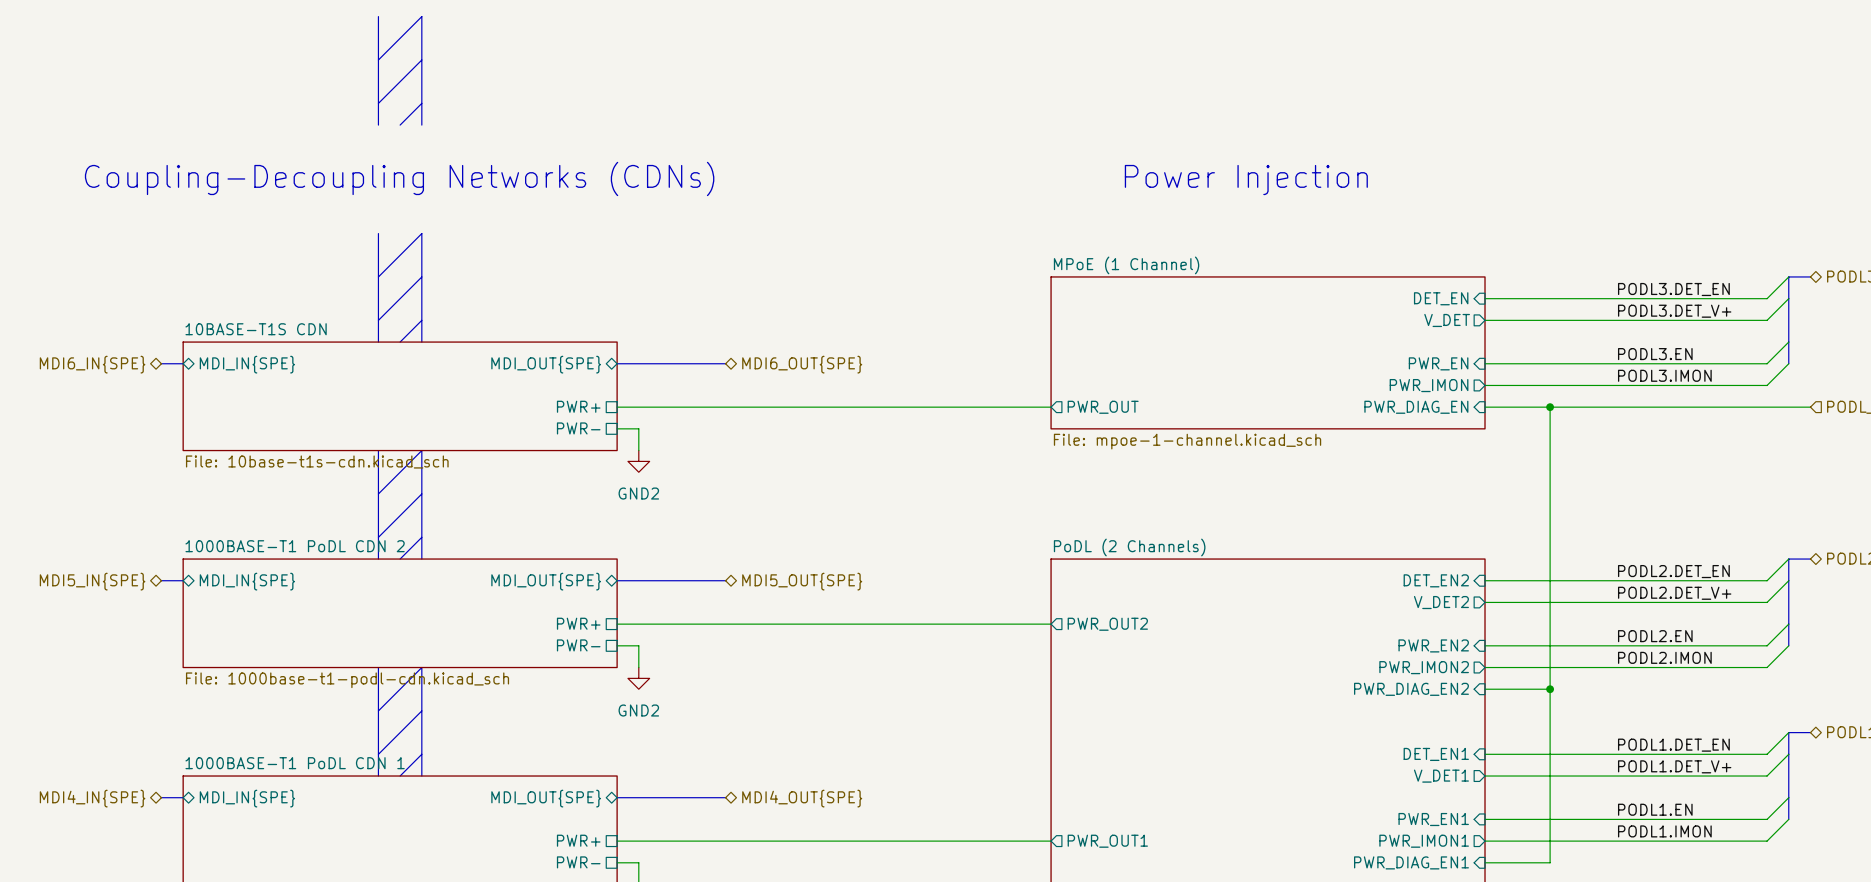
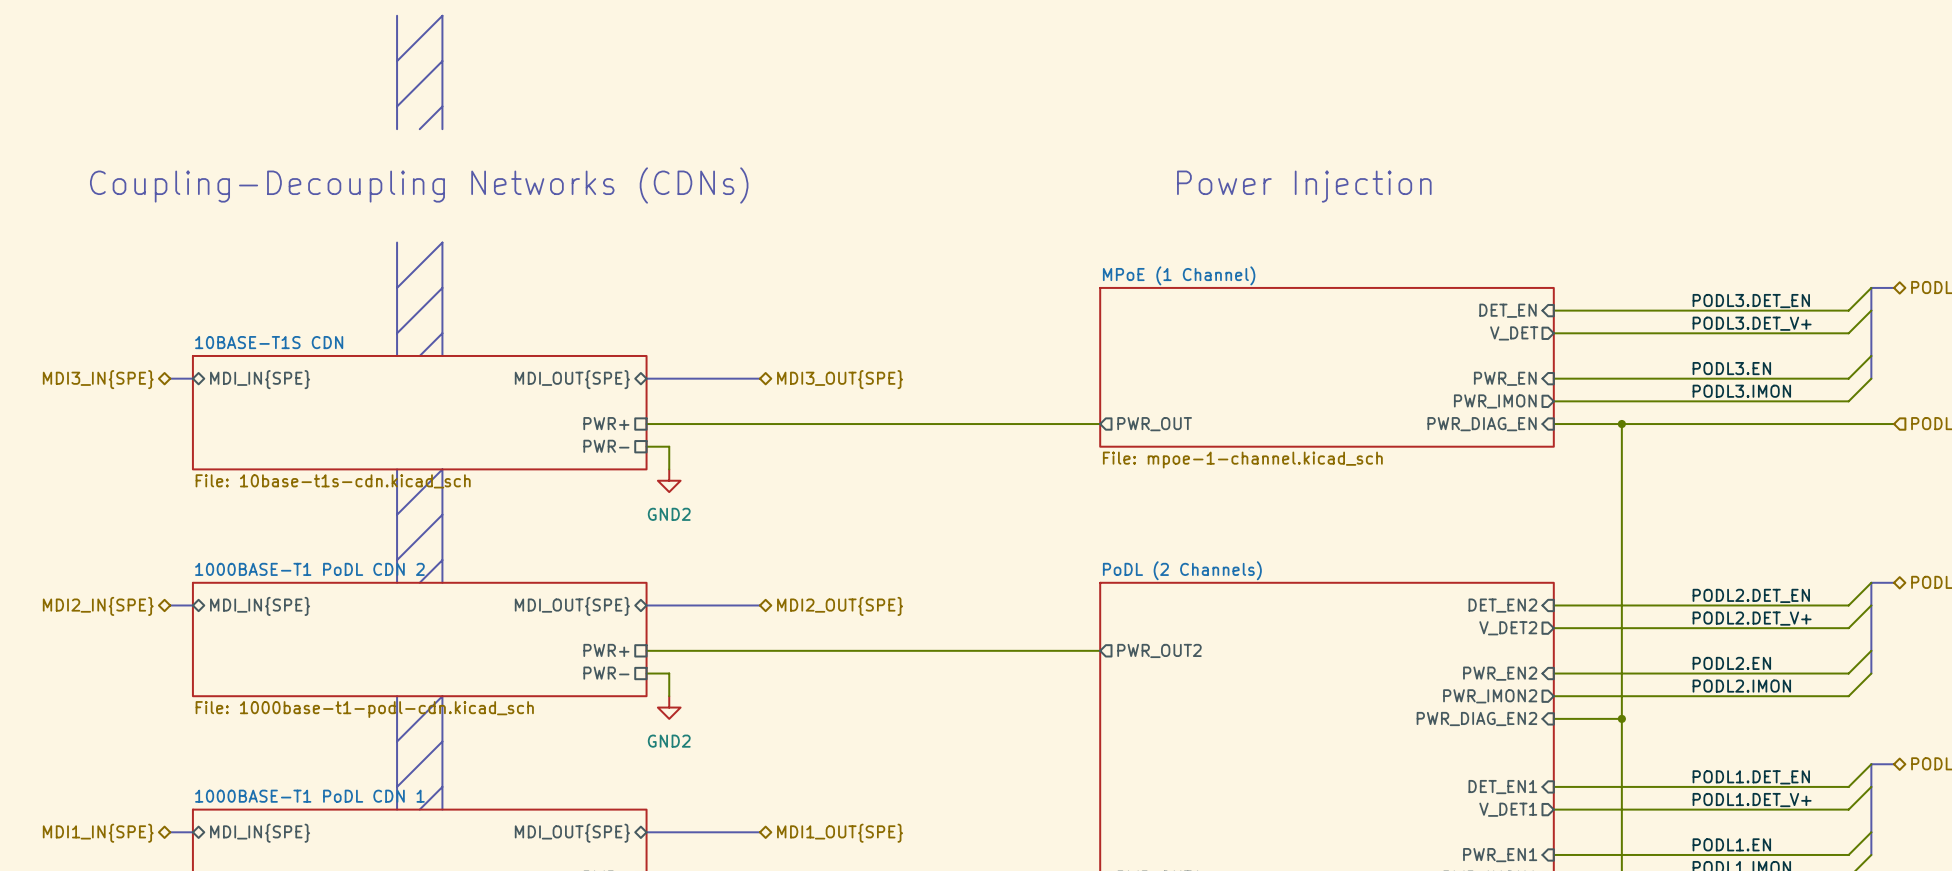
hierarchical label: MDI6_IN{SPE} (92, 364) -> MDI3_IN{SPE} (98, 379)
hierarchical label: MDI6_OUT{SPE} (802, 364) -> MDI3_OUT{SPE} (840, 379)
hierarchical label: MDI5_IN{SPE} (92, 581) -> MDI2_IN{SPE} (98, 606)
hierarchical label: MDI5_OUT{SPE} (802, 581) -> MDI2_OUT{SPE} (840, 606)
hierarchical label: MDI4_IN{SPE} (92, 798) -> MDI1_IN{SPE} (98, 833)
hierarchical label: MDI4_OUT{SPE} (802, 798) -> MDI1_OUT{SPE} (840, 833)

